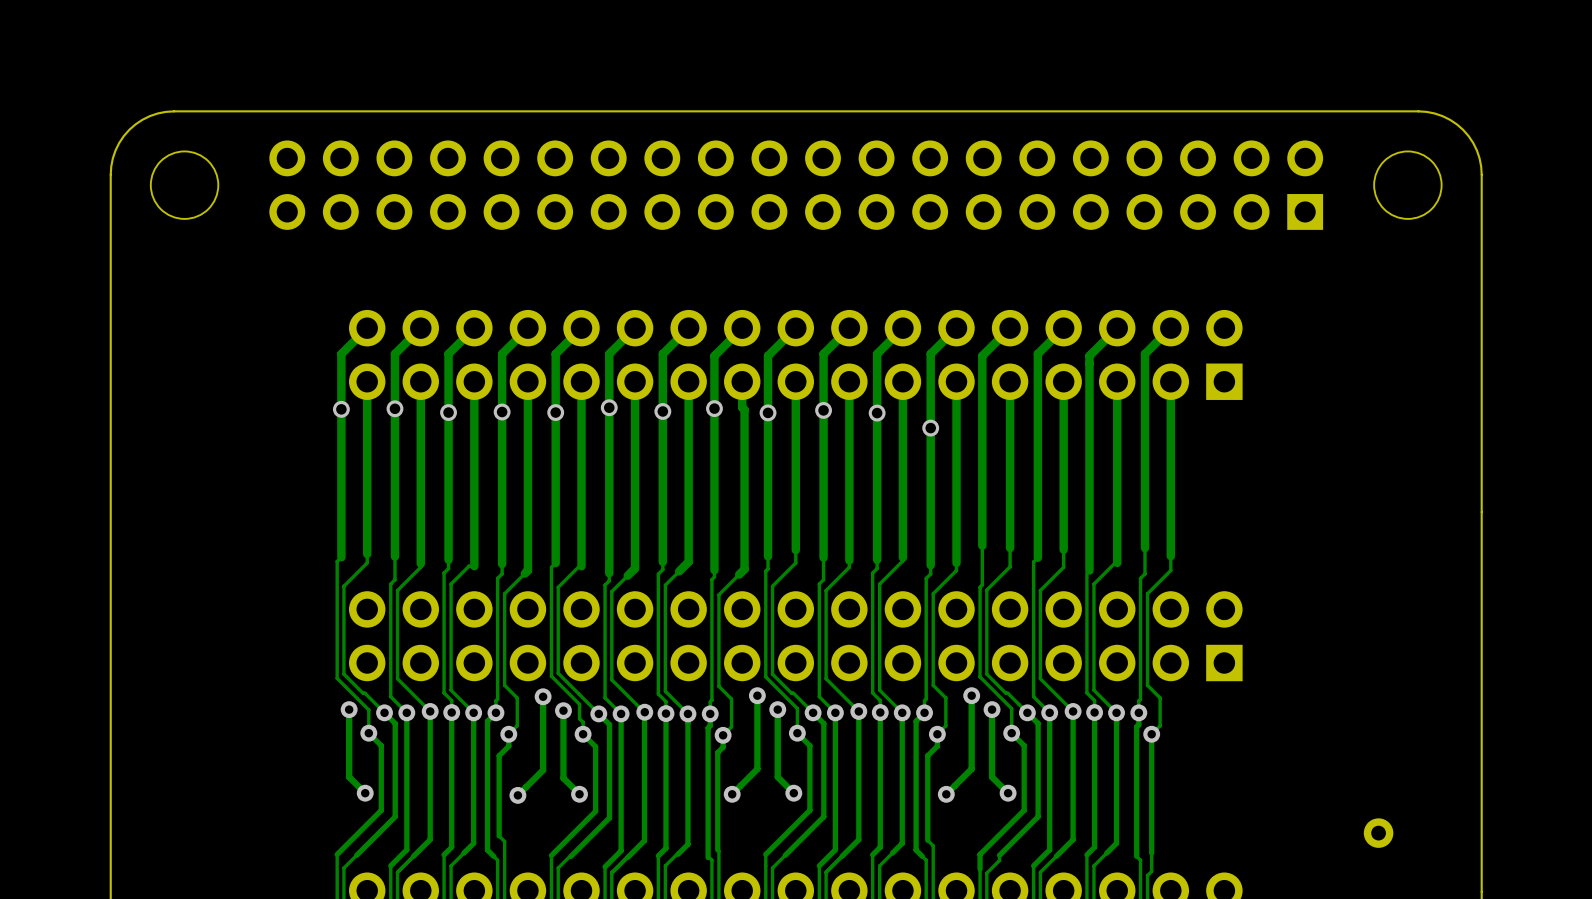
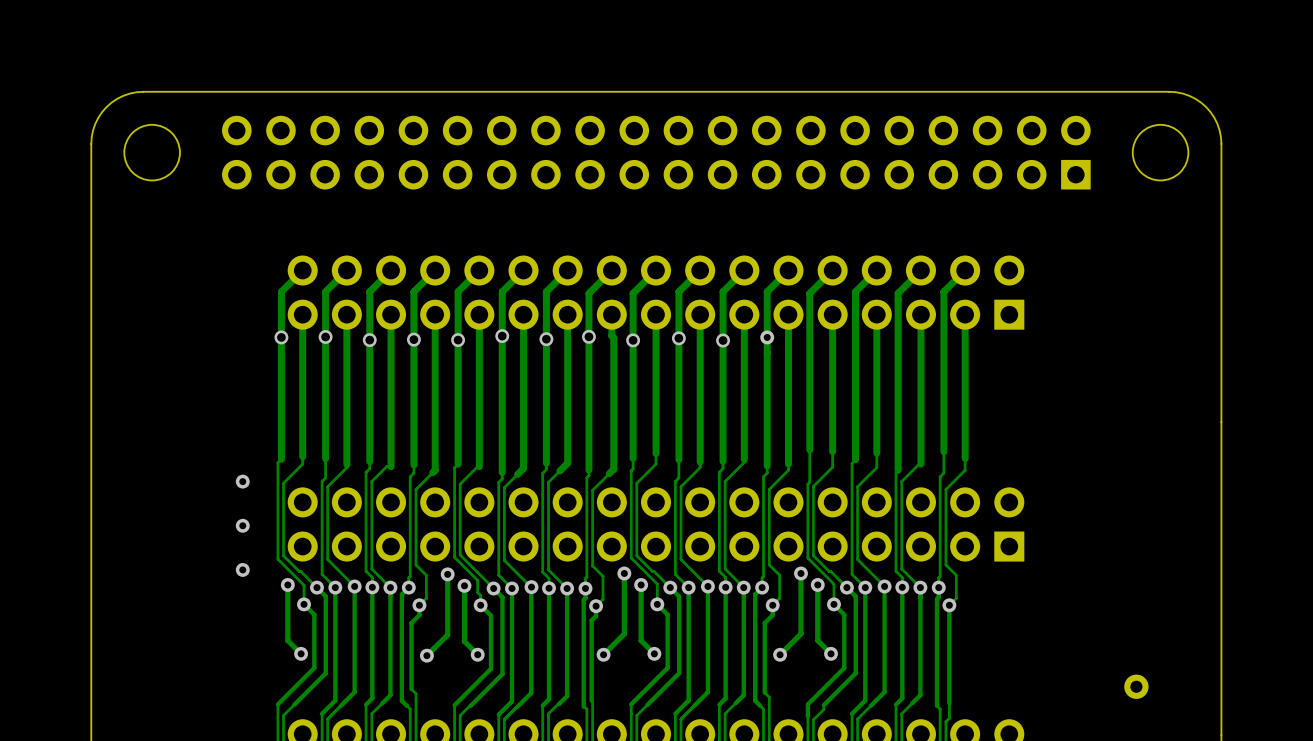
via: none -> (767, 337)
via: (930, 428) -> none
via: none -> (242, 481)
via: none -> (242, 525)
via: none -> (242, 569)

